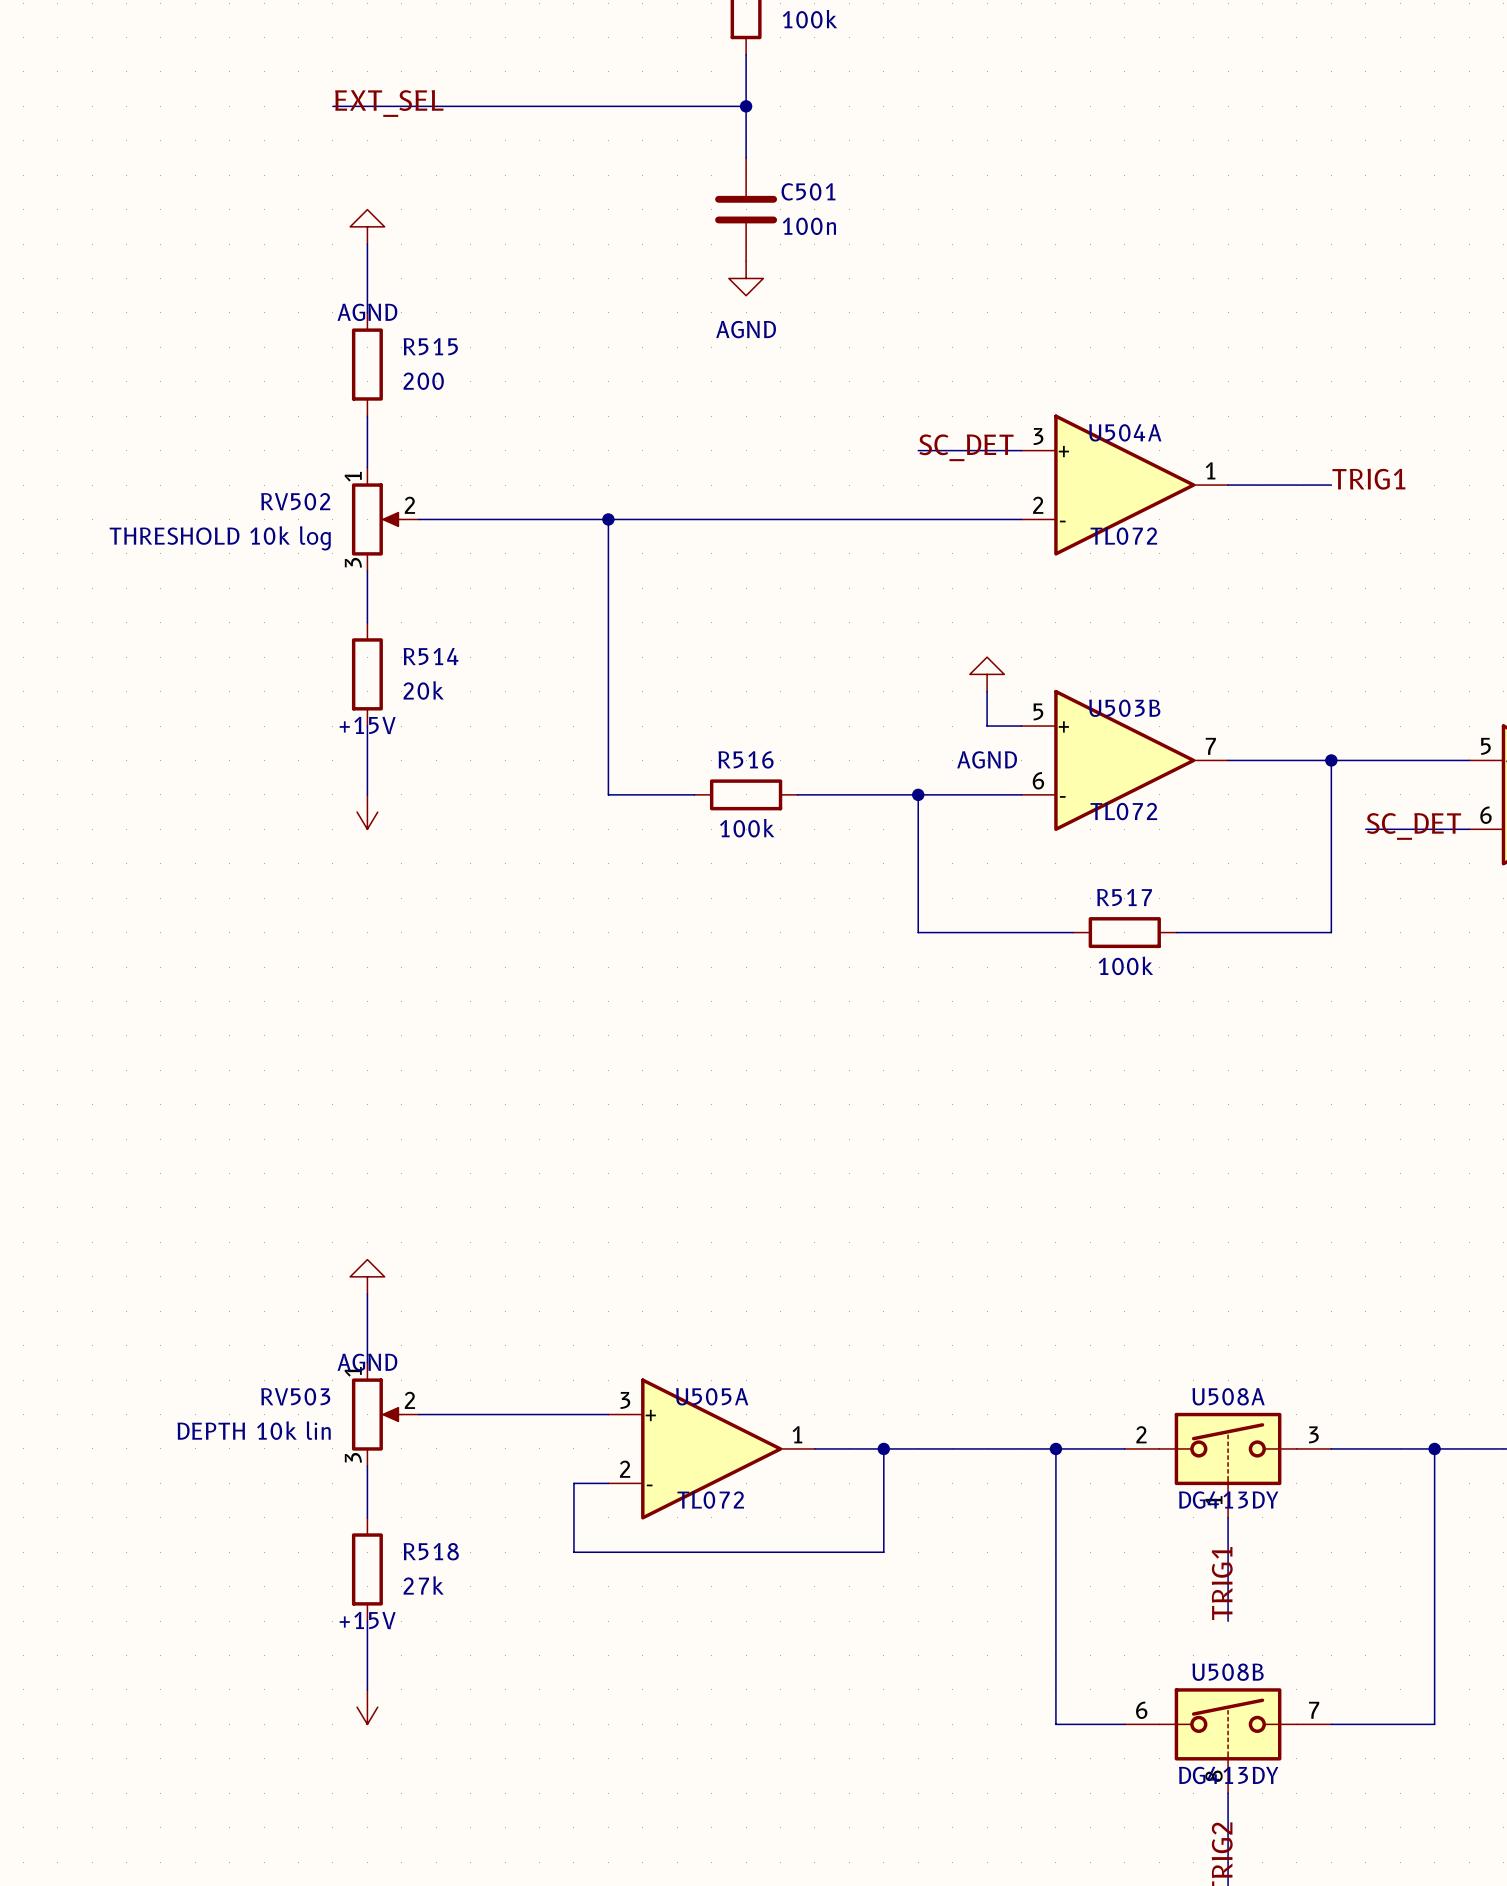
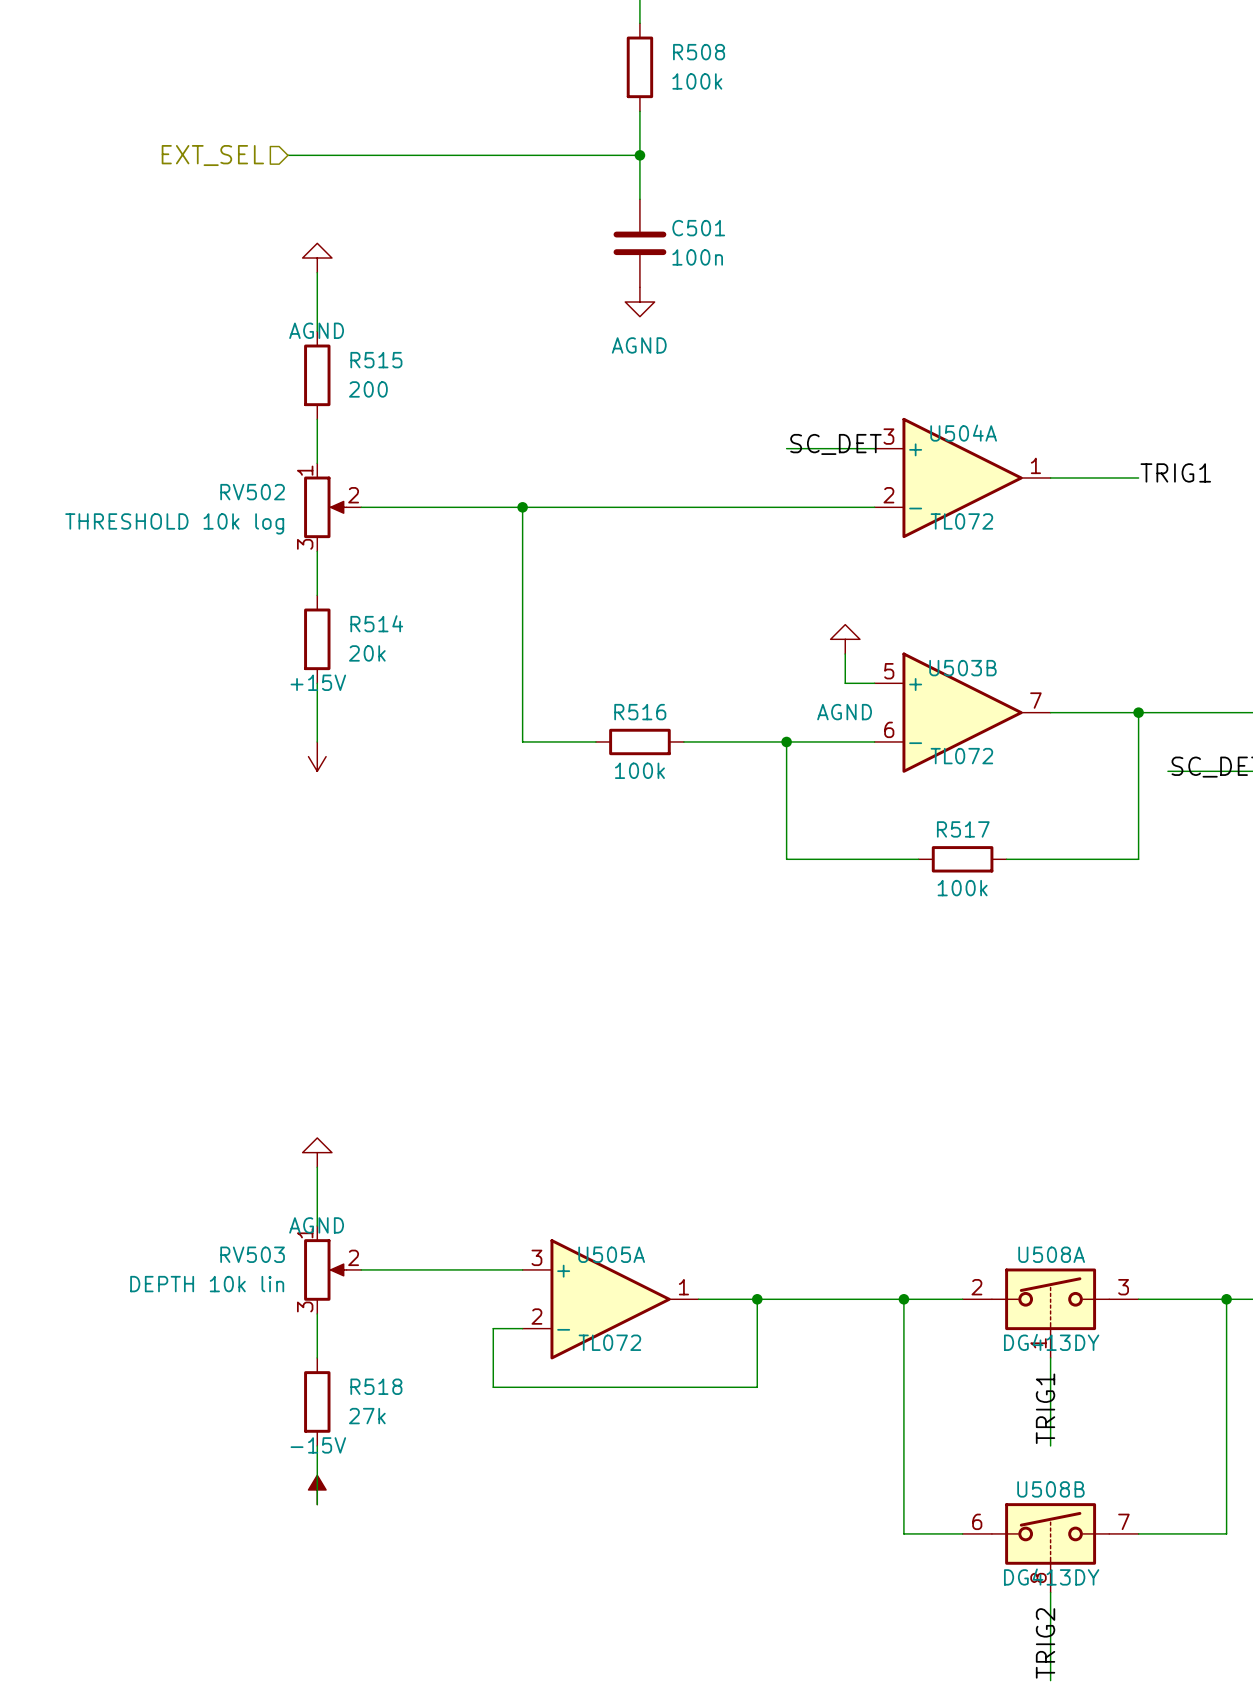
label: EXT_SEL (389, 103) -> none
hierarchical label: none -> EXT_SEL (212, 155)
power symbol: none -> -15V (317, 1489)
power symbol: +15V (367, 1707) -> none

